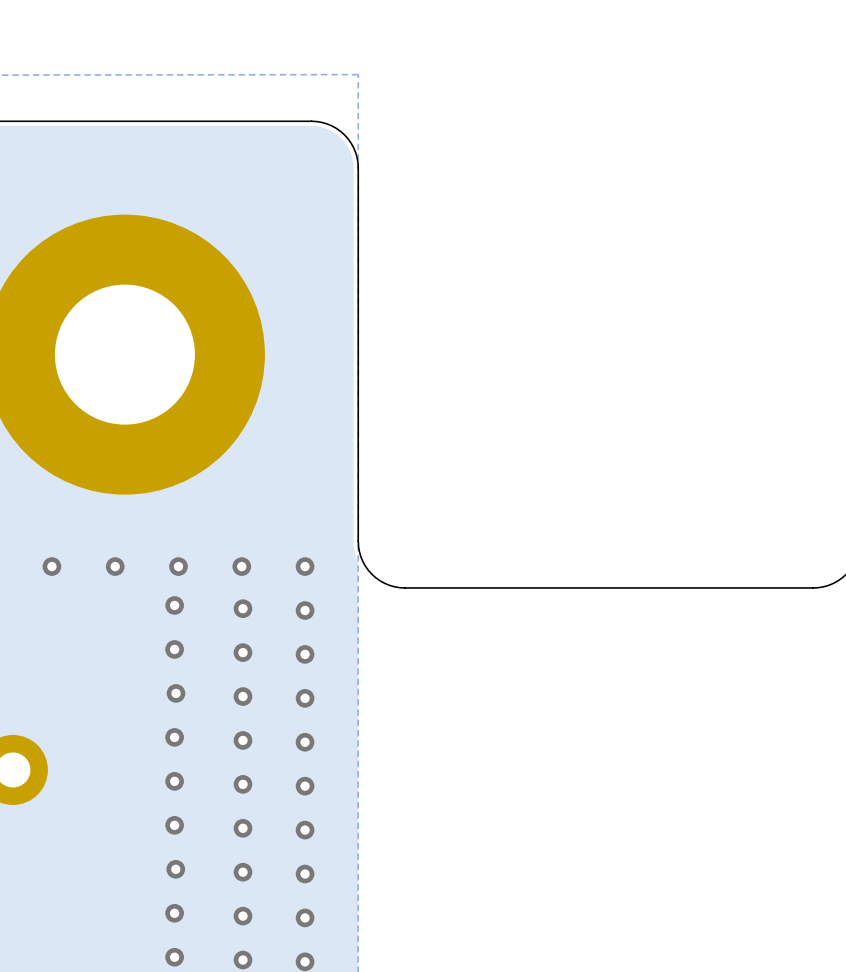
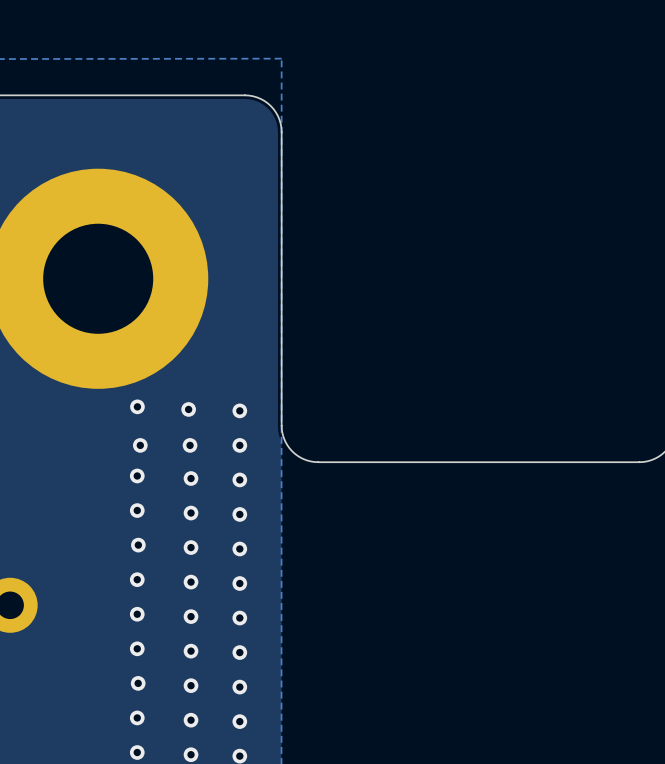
via: none -> (137, 406)
via: none -> (188, 409)
via: none -> (239, 410)
via: (51, 566) -> none
via: (115, 566) -> none

